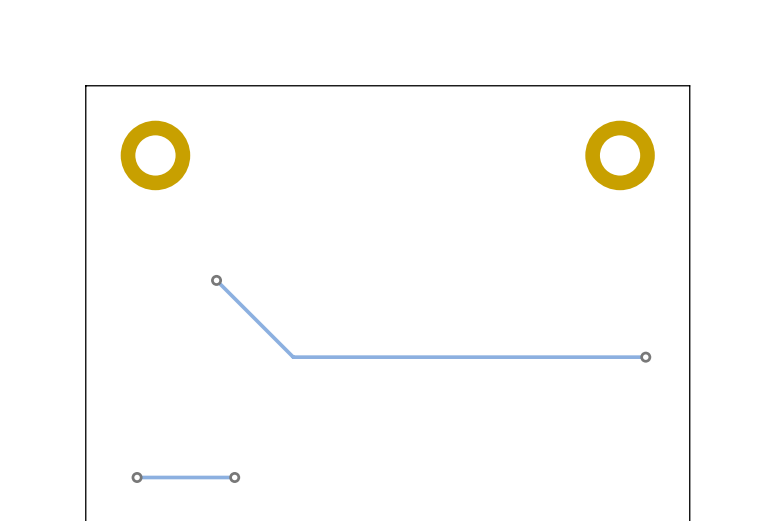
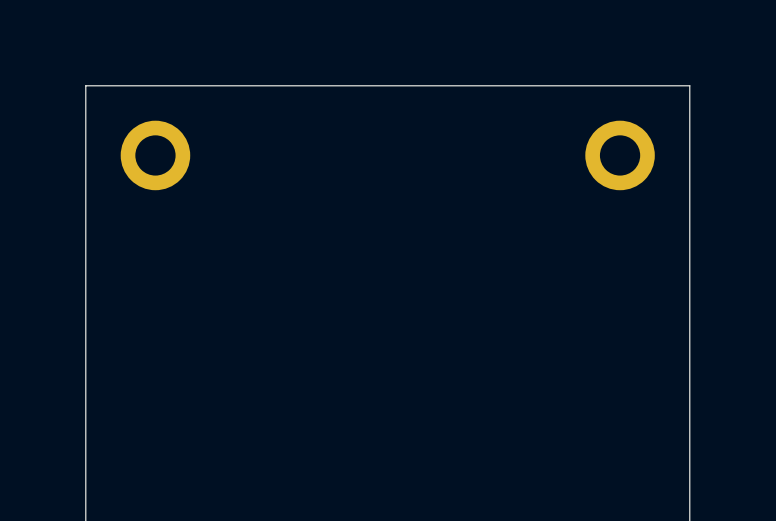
track: (216, 280) (293, 357) (645, 357) -> none
via: (216, 280) -> none
via: (645, 357) -> none
via: (137, 477) -> none
track: (234, 477) (137, 477) -> none
via: (234, 477) -> none

